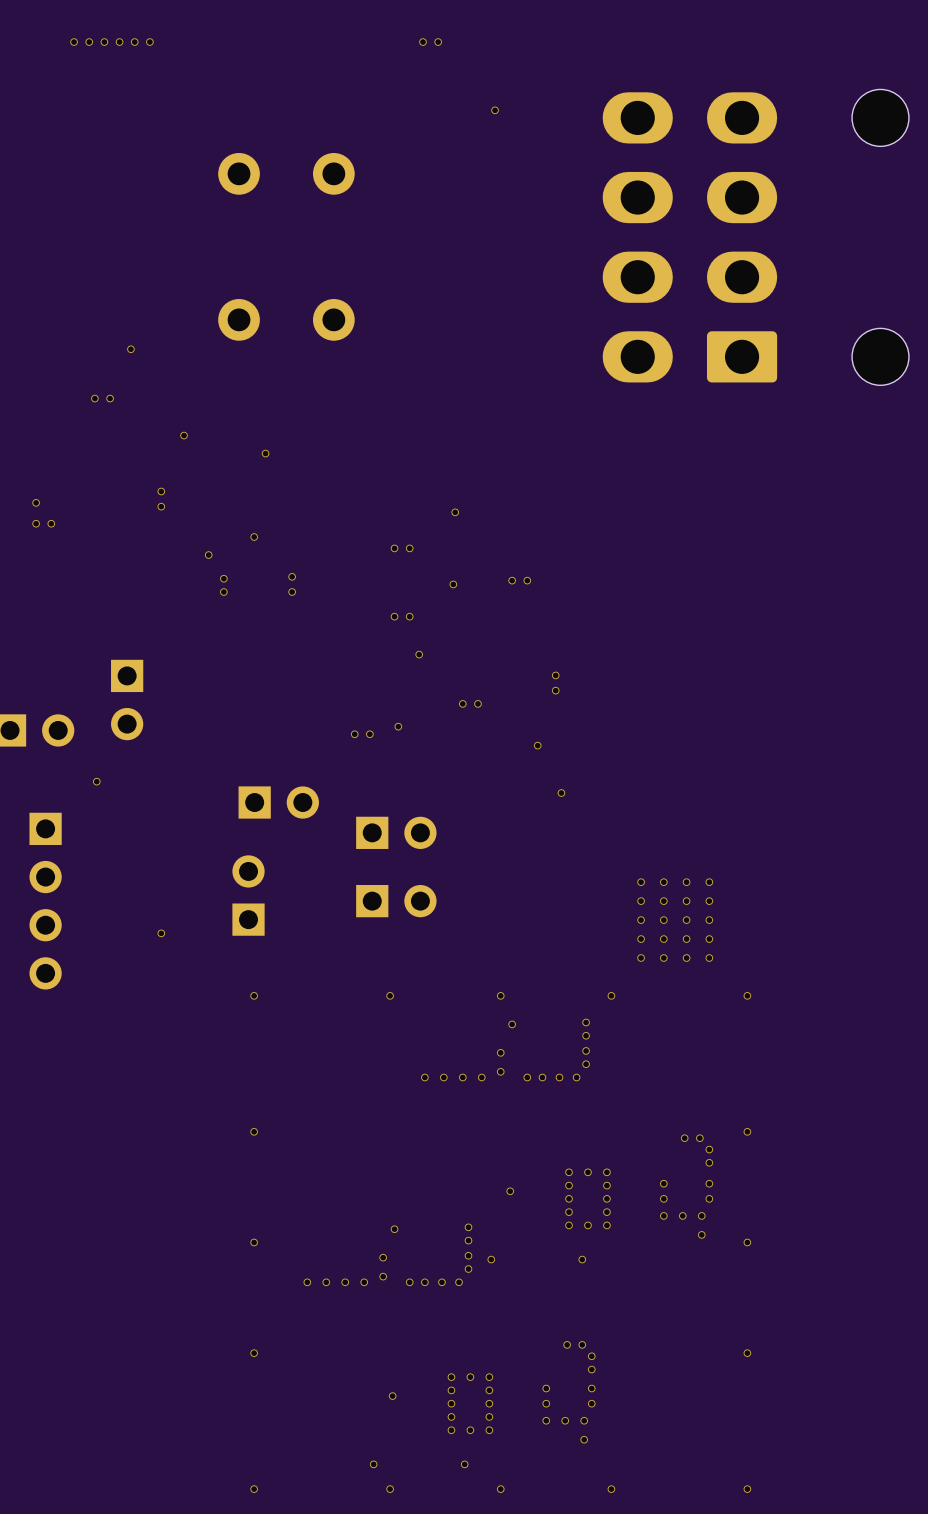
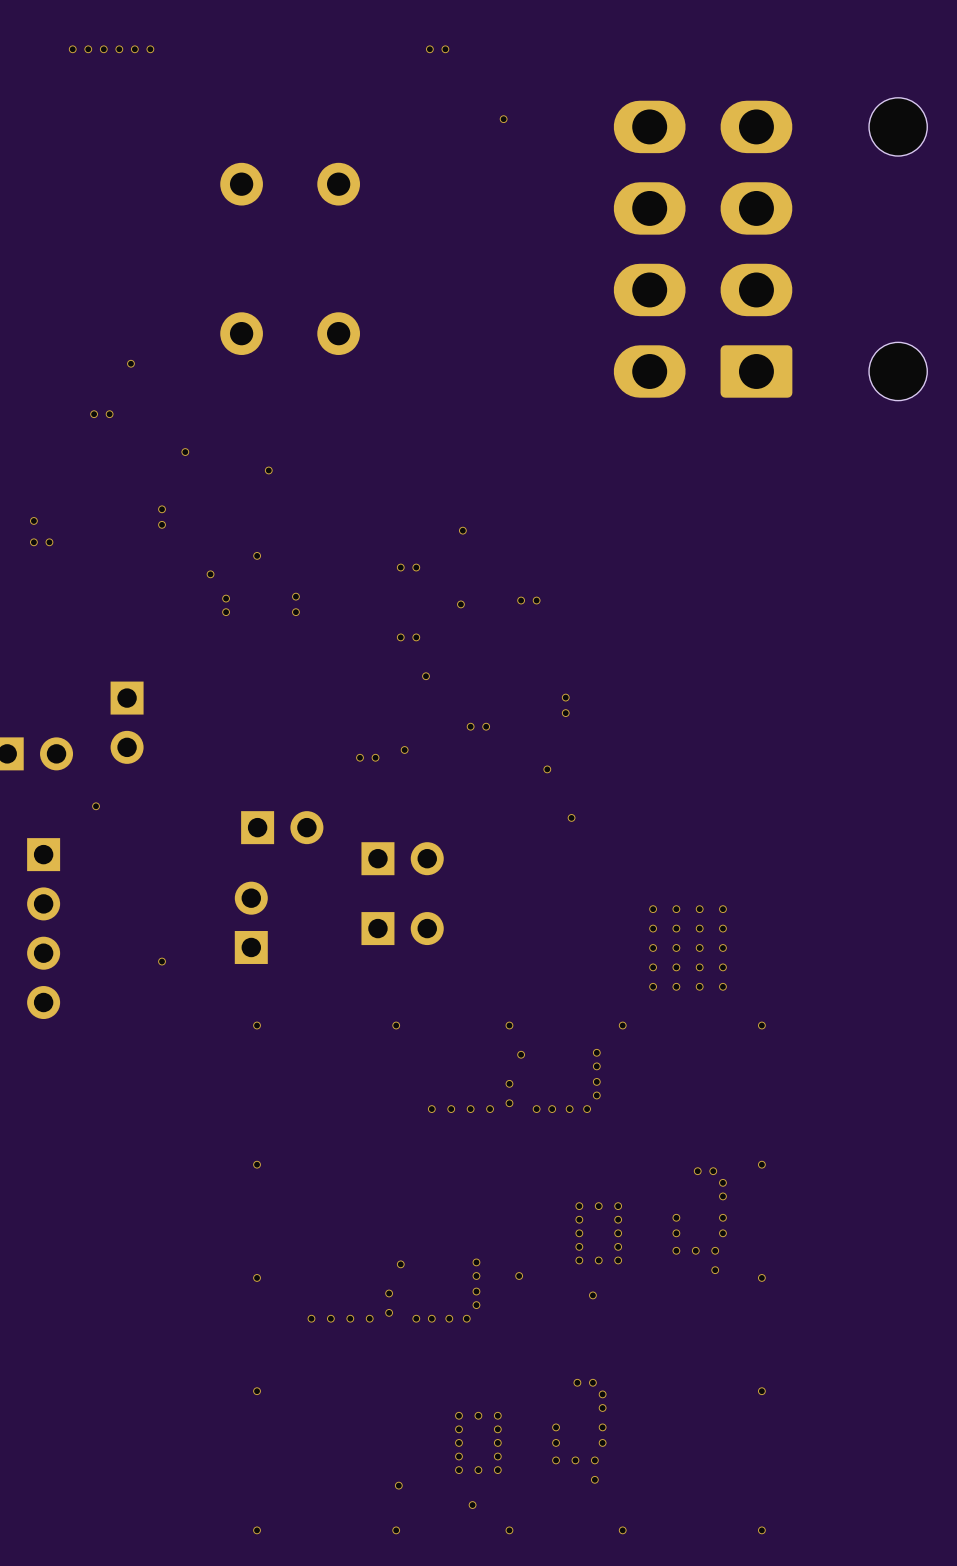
via: (510, 1191) -> none
via: none -> (519, 1276)
via: (491, 1259) -> none
via: (392, 1396) -> none
via: none -> (398, 1485)
via: (373, 1464) -> none

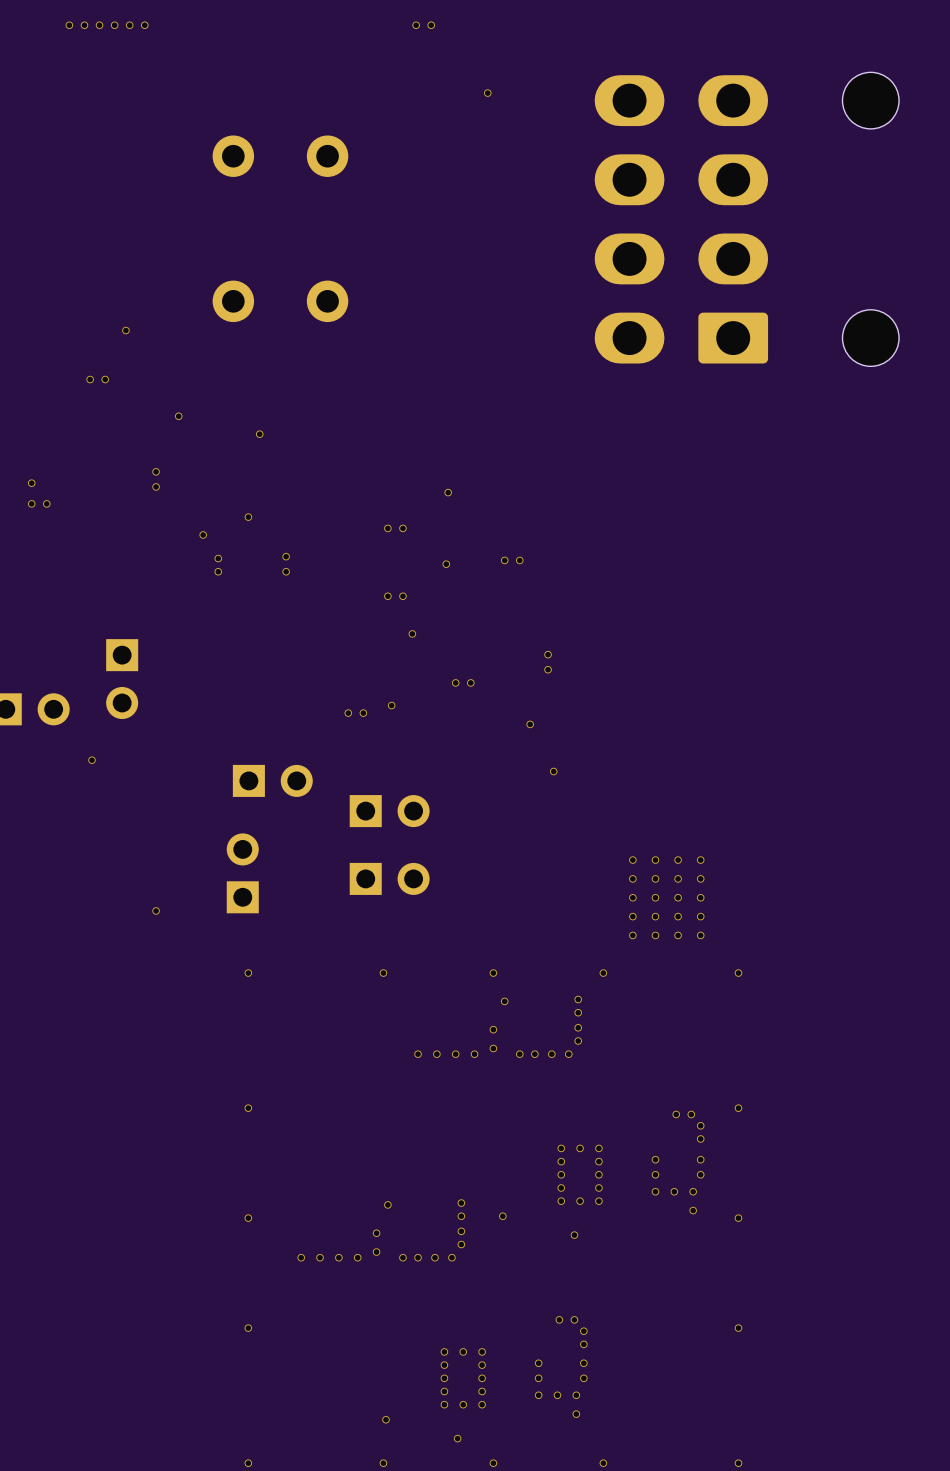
part: (43, 928) -> none

